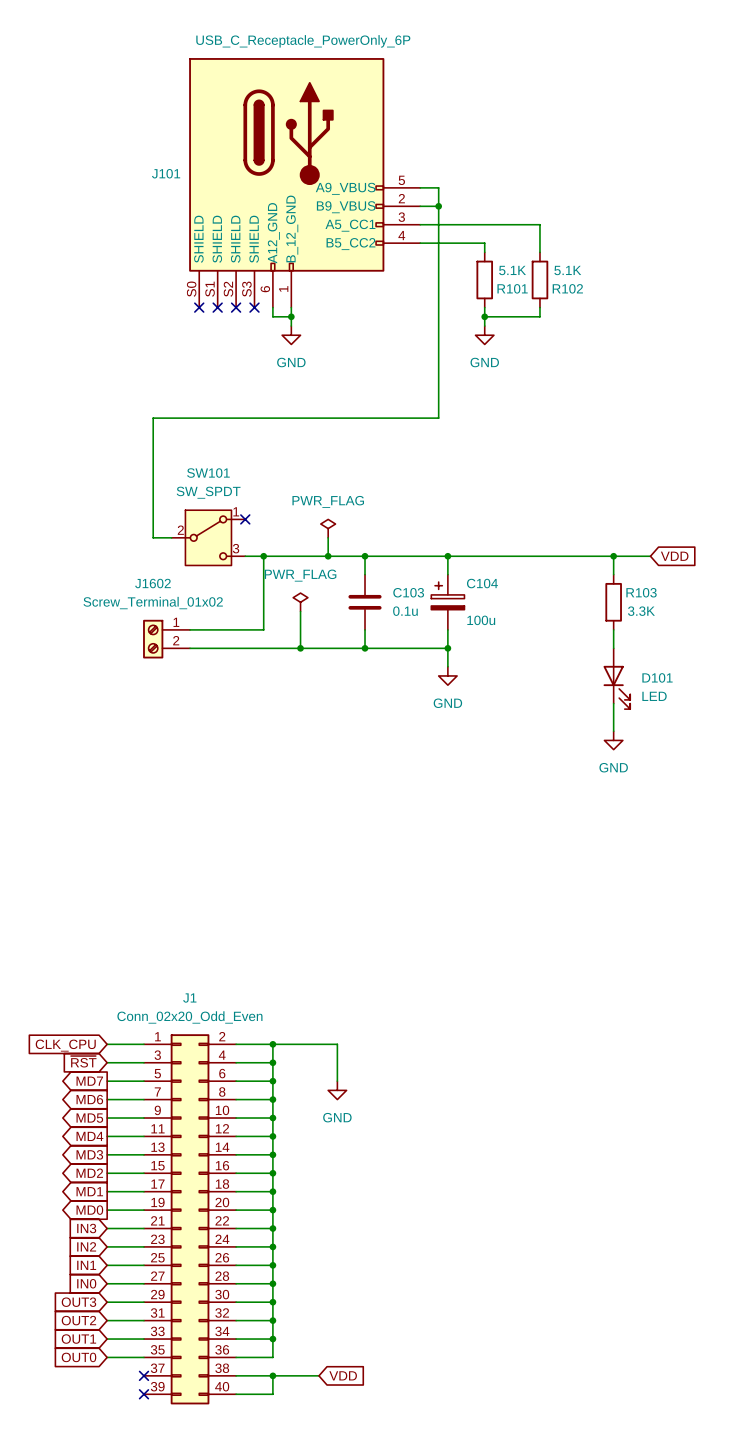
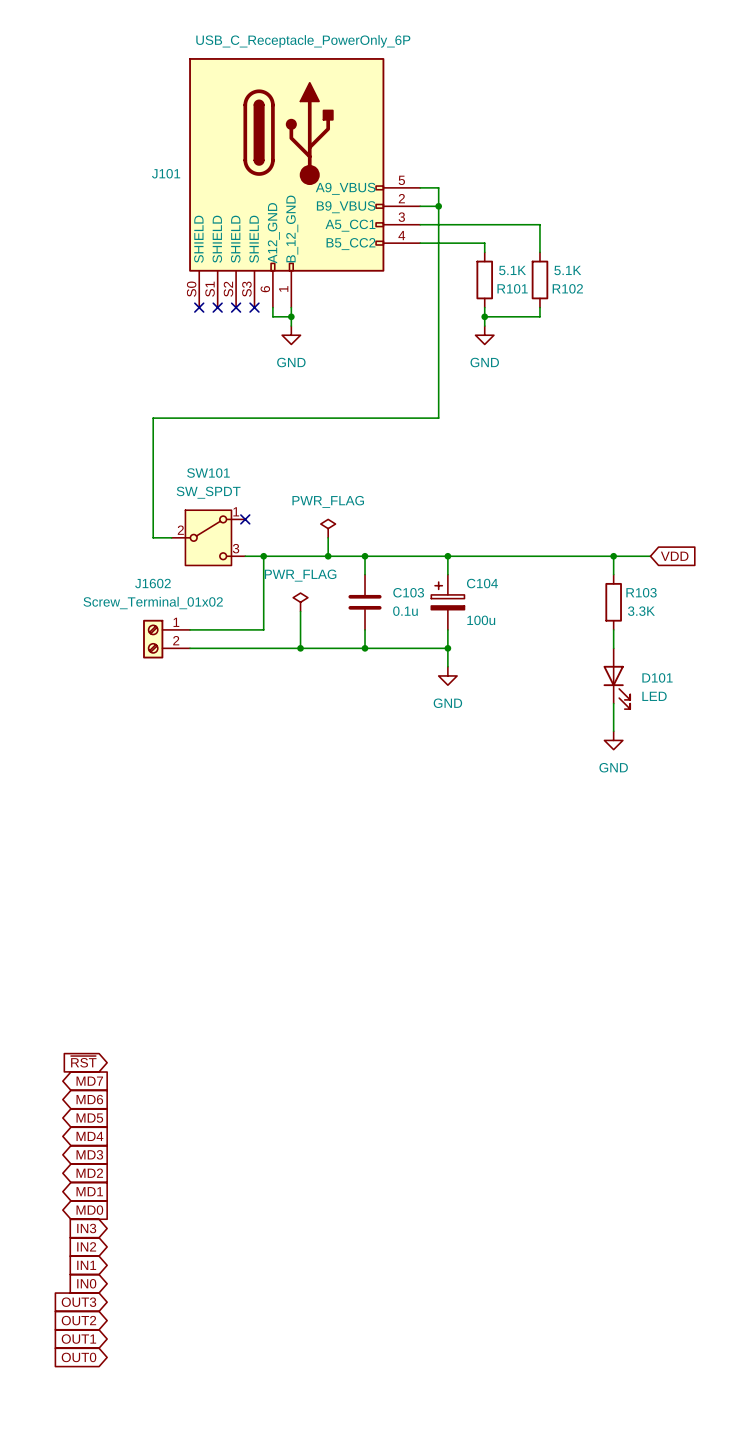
wire: (107, 1044) (143, 1044) -> none
wire: (236, 1044) (337, 1044) (337, 1081) -> none
wire: (272, 1044) (272, 1357) (236, 1357) -> none
junction: (272, 1044) -> none
global label: CLK_CPU (65, 1045) -> none
wire: (107, 1062) (143, 1062) -> none
wire: (236, 1062) (272, 1062) -> none
junction: (272, 1062) -> none
wire: (107, 1081) (143, 1081) -> none
wire: (236, 1081) (272, 1081) -> none
junction: (272, 1081) -> none
power symbol: GND (337, 1090) -> none
wire: (107, 1099) (143, 1099) -> none
wire: (236, 1099) (272, 1099) -> none
junction: (272, 1099) -> none
wire: (107, 1118) (143, 1118) -> none
wire: (236, 1118) (272, 1118) -> none
junction: (272, 1118) -> none
wire: (107, 1136) (143, 1136) -> none
wire: (236, 1136) (272, 1136) -> none
junction: (272, 1136) -> none
wire: (107, 1154) (143, 1154) -> none
wire: (236, 1154) (272, 1154) -> none
junction: (272, 1154) -> none
wire: (107, 1173) (143, 1173) -> none
wire: (236, 1173) (272, 1173) -> none
junction: (272, 1173) -> none
wire: (107, 1191) (143, 1191) -> none
wire: (236, 1191) (272, 1191) -> none
junction: (272, 1191) -> none
wire: (107, 1210) (143, 1210) -> none
wire: (236, 1210) (272, 1210) -> none
junction: (272, 1210) -> none
J1: Conn_02x20_Odd_Even (190, 1219) -> none
wire: (107, 1228) (143, 1228) -> none
wire: (236, 1228) (272, 1228) -> none
junction: (272, 1228) -> none
wire: (107, 1246) (143, 1246) -> none
wire: (236, 1246) (272, 1246) -> none
junction: (272, 1246) -> none
wire: (107, 1265) (143, 1265) -> none
wire: (236, 1265) (272, 1265) -> none
junction: (272, 1265) -> none
wire: (107, 1283) (143, 1283) -> none
wire: (236, 1283) (272, 1283) -> none
junction: (272, 1283) -> none
wire: (107, 1302) (143, 1302) -> none
wire: (236, 1302) (272, 1302) -> none
junction: (272, 1302) -> none
wire: (107, 1320) (143, 1320) -> none
wire: (236, 1320) (272, 1320) -> none
junction: (272, 1320) -> none
wire: (107, 1339) (143, 1339) -> none
wire: (236, 1339) (272, 1339) -> none
junction: (272, 1339) -> none
wire: (107, 1357) (143, 1357) -> none
no-connect mark: (143, 1375) -> none
wire: (236, 1375) (318, 1375) -> none
wire: (272, 1375) (272, 1394) (236, 1394) -> none
junction: (272, 1375) -> none
global label: VDD (343, 1375) -> none
no-connect mark: (143, 1394) -> none

